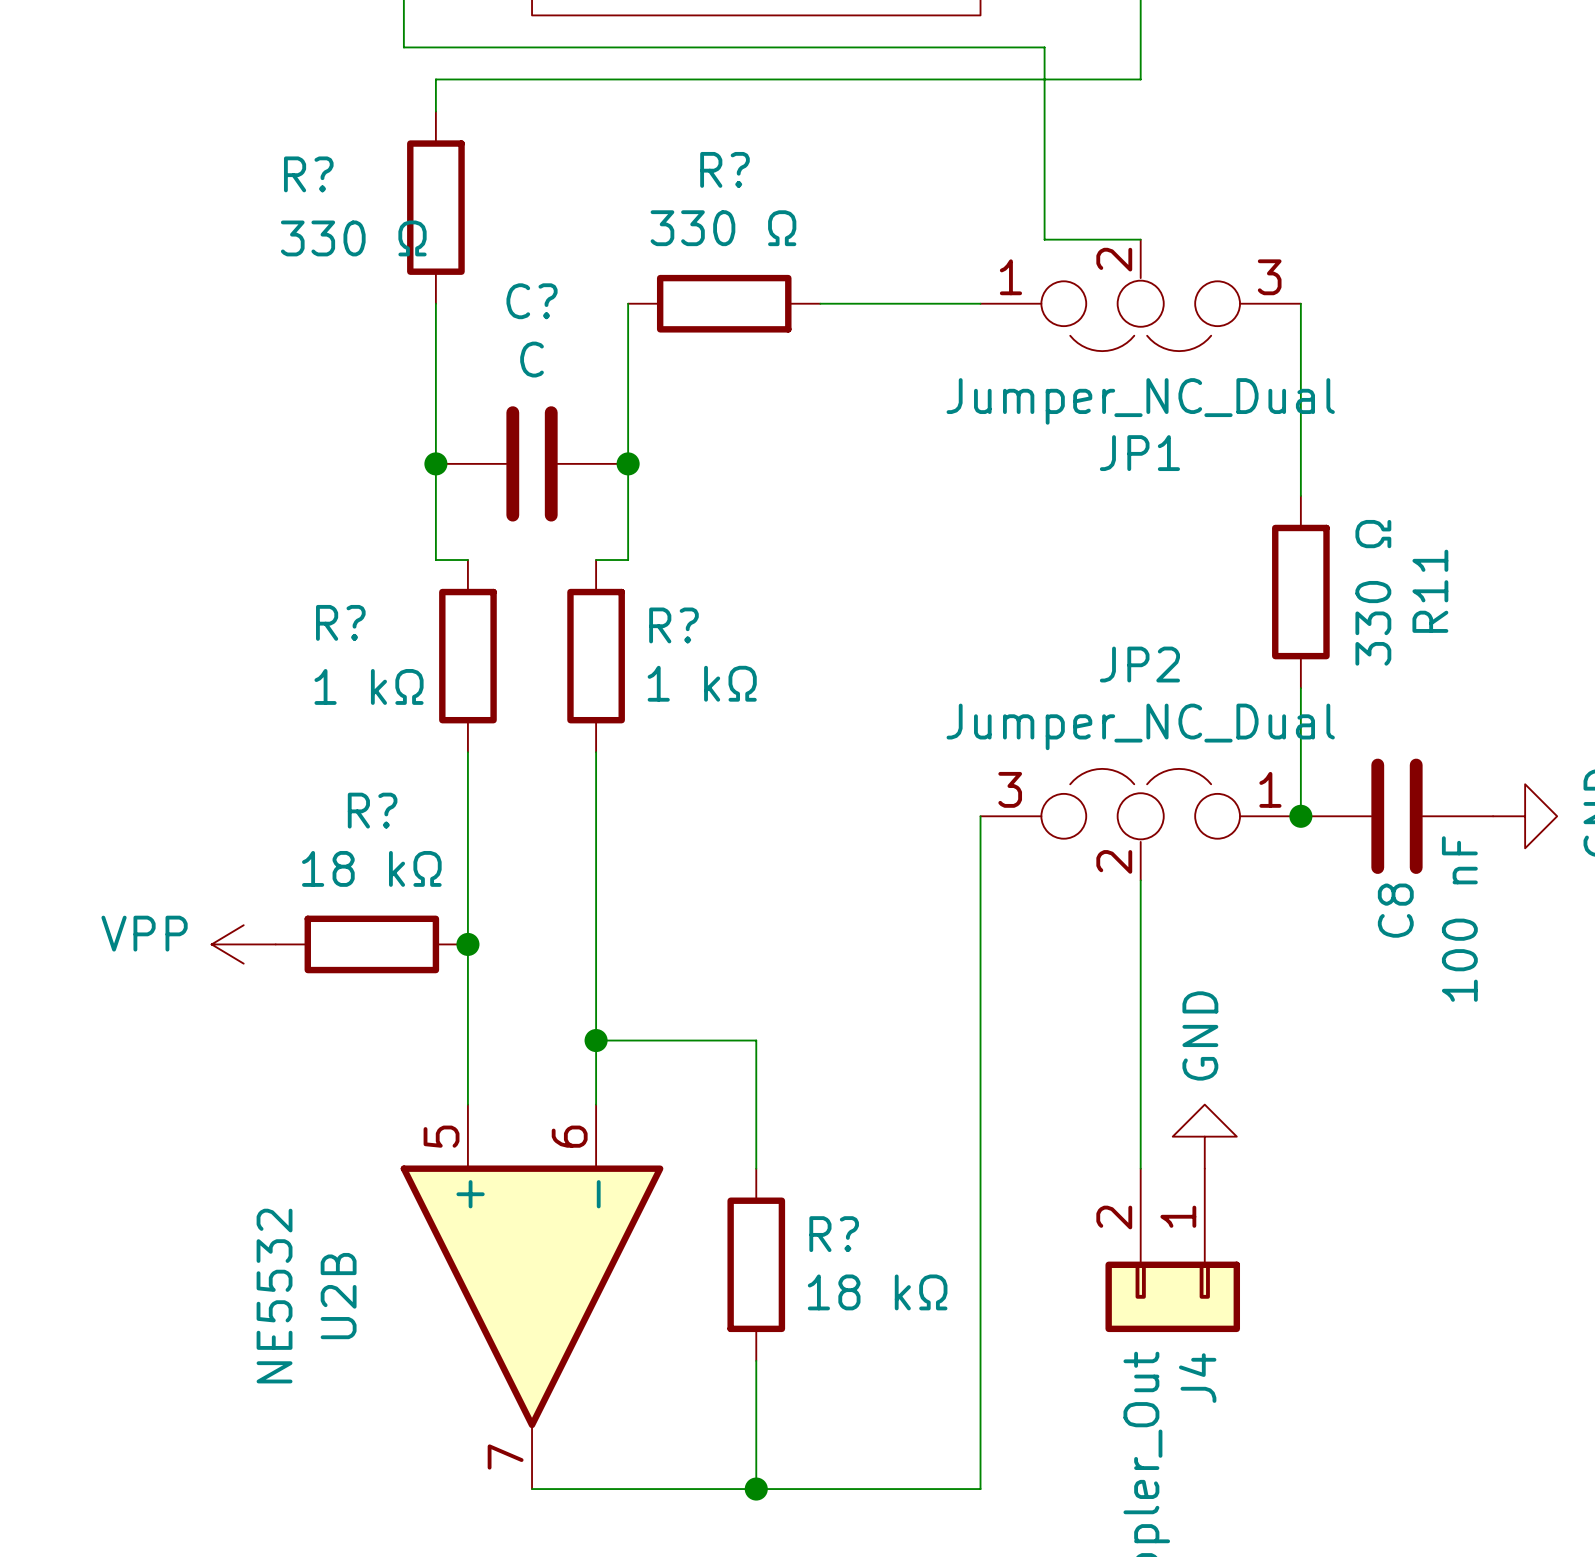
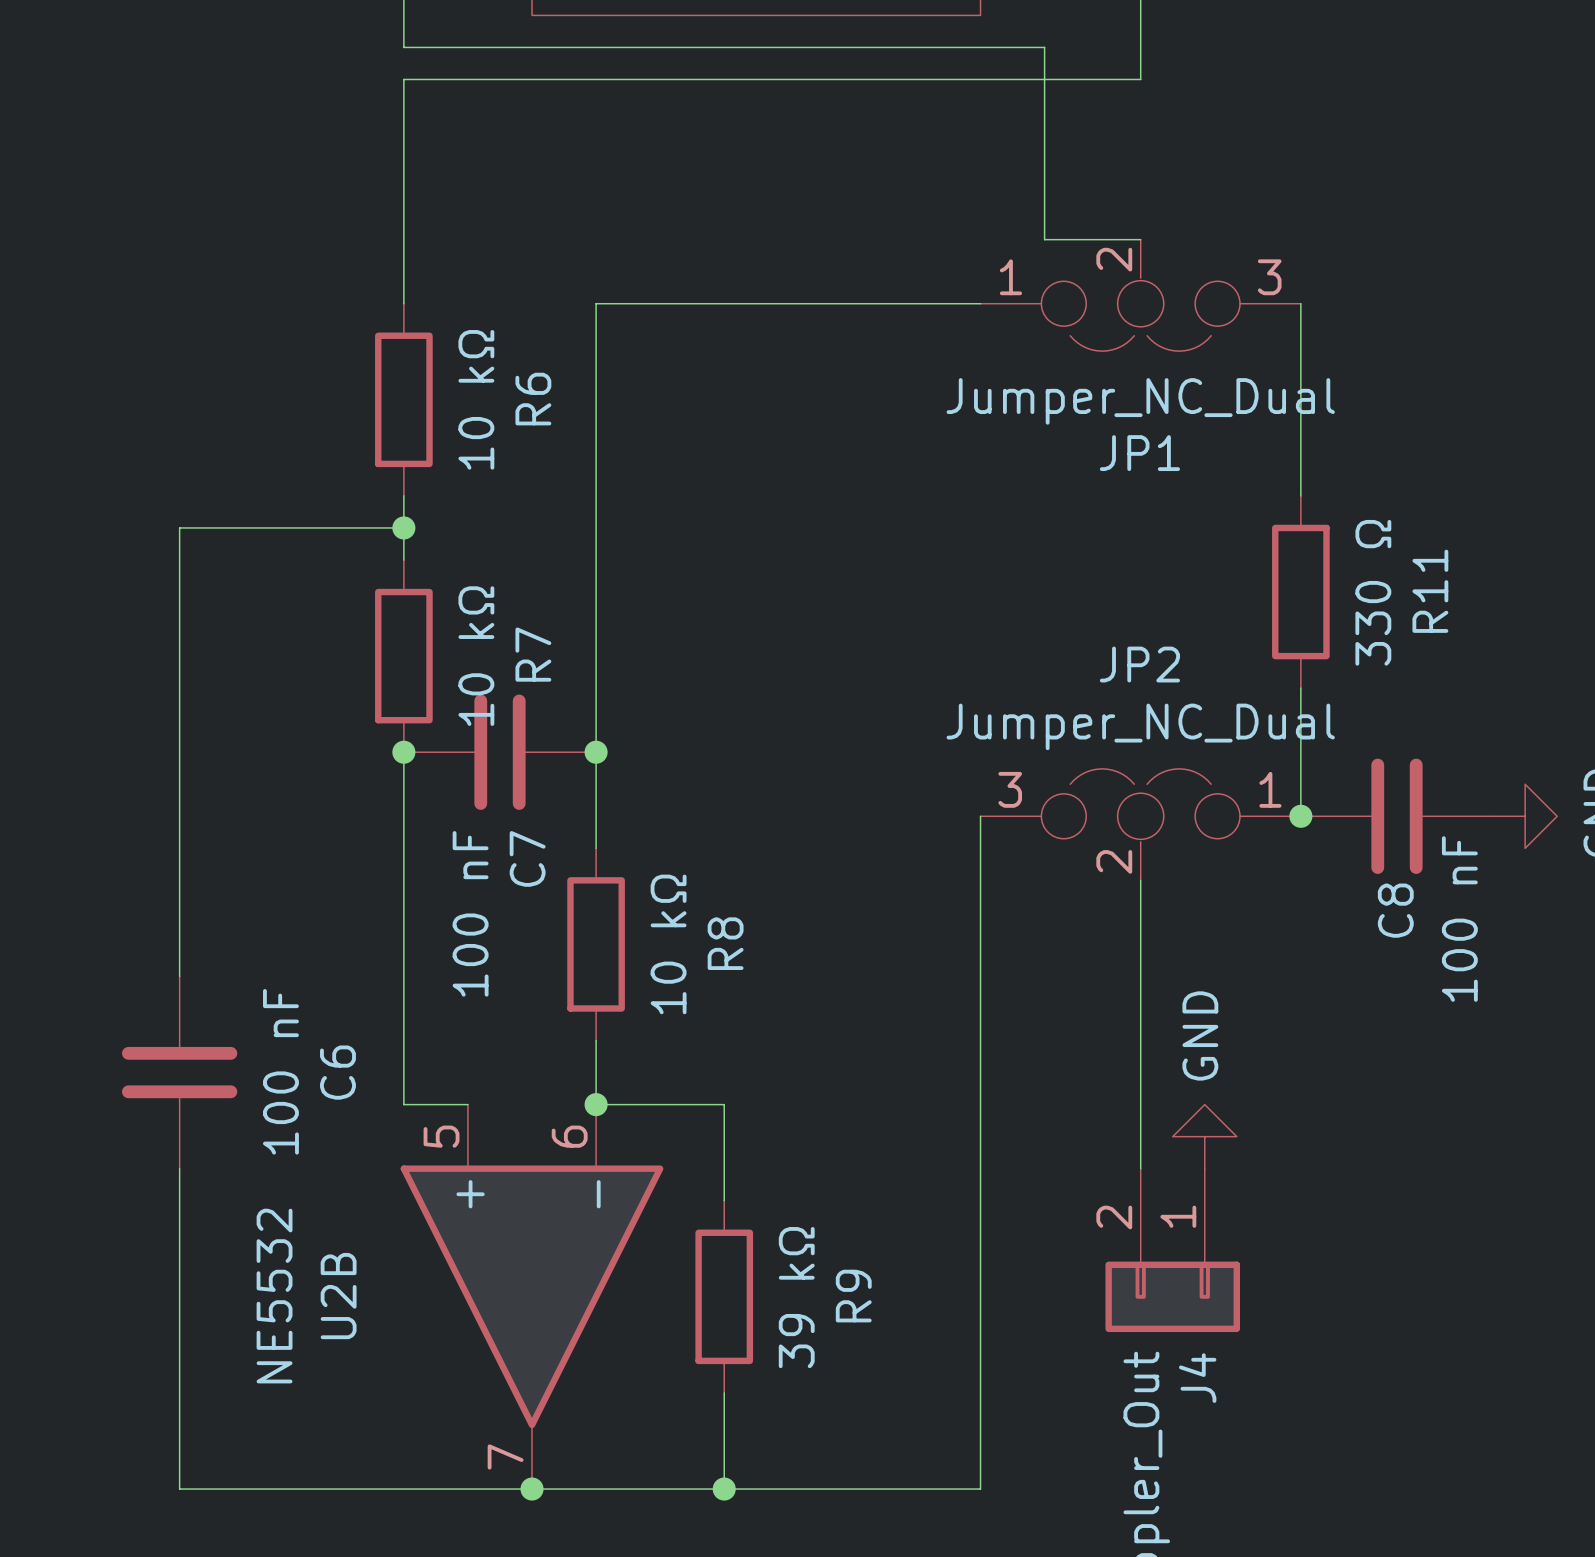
wire: (435, 79) (435, 111) -> (435, 79) (403, 79) (403, 303)
R?: 330 Ω (435, 207) -> none
wire: (435, 303) (435, 560) (467, 560) -> none
wire: (628, 303) (628, 560) (596, 560) -> none
R?: 330 Ω (724, 303) -> none
wire: none -> (820, 303) (596, 303) (596, 752)
R6: none -> 10 kΩ (403, 399)
junction position: (435, 463) -> (403, 527)
C?: C (532, 463) -> none
junction: (628, 463) -> none
wire: none -> (403, 495) (403, 560)
wire: none -> (403, 527) (179, 527) (179, 976)
R7: none -> 10 kΩ (403, 656)
R?: 1 kΩ (467, 656) -> none
R?: 1 kΩ (596, 656) -> none
junction: none -> (403, 752)
wire: (467, 752) (467, 1104) -> (403, 752) (403, 1104) (467, 1104)
C7: none -> 100 nF (499, 752)
junction: none -> (596, 752)
wire: (596, 848) (596, 1040) (756, 1040) (756, 1168) -> none
power symbol: VPP (243, 944) -> none
R?: 18 kΩ (371, 944) -> none
junction: (467, 944) -> none
R8: none -> 10 kΩ (596, 944)
junction position: (596, 1040) -> (596, 1104)
C6: none -> 100 nF (179, 1072)
wire: none -> (596, 1104) (724, 1104) (724, 1200)
wire: none -> (179, 1168) (179, 1489) (532, 1489)
R?: 18 kΩ (756, 1264) -> none
R9: none -> 39 kΩ (724, 1296)
wire: (756, 1360) (756, 1489) -> none
wire: none -> (724, 1392) (724, 1489)
junction: none -> (532, 1489)
junction position: (756, 1489) -> (724, 1489)

